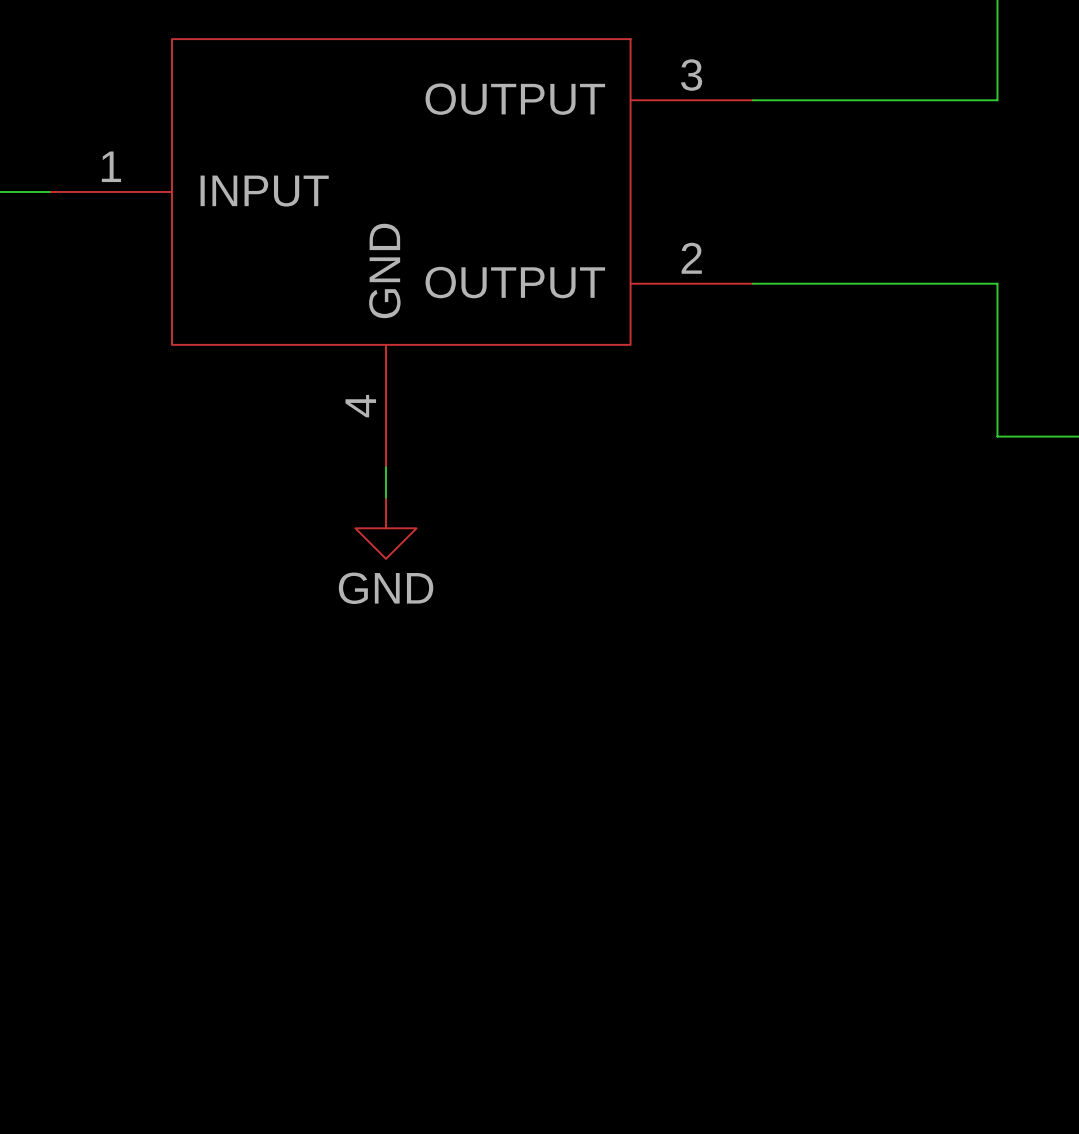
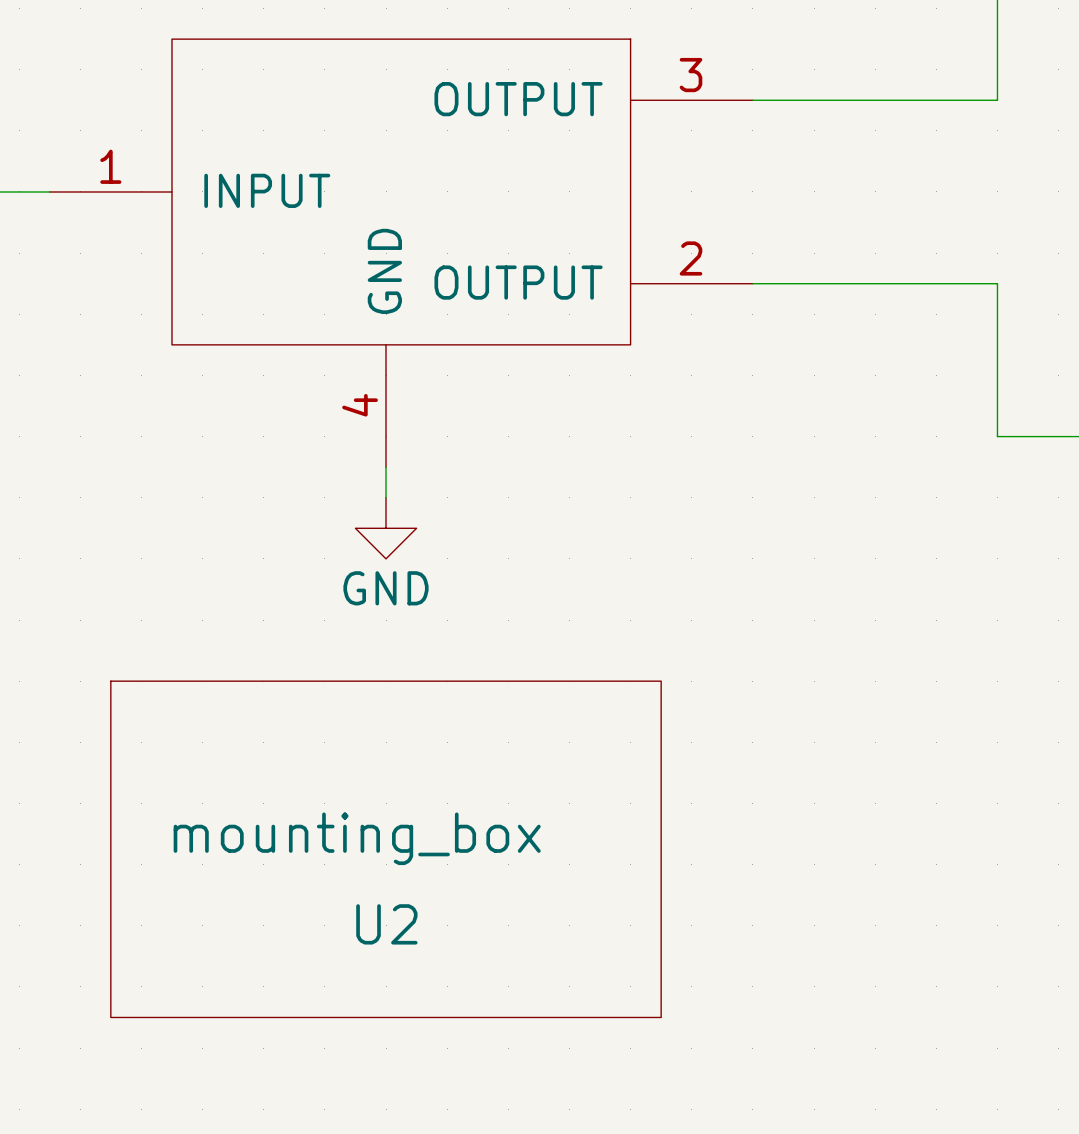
U2: none -> mounting_box (386, 849)

